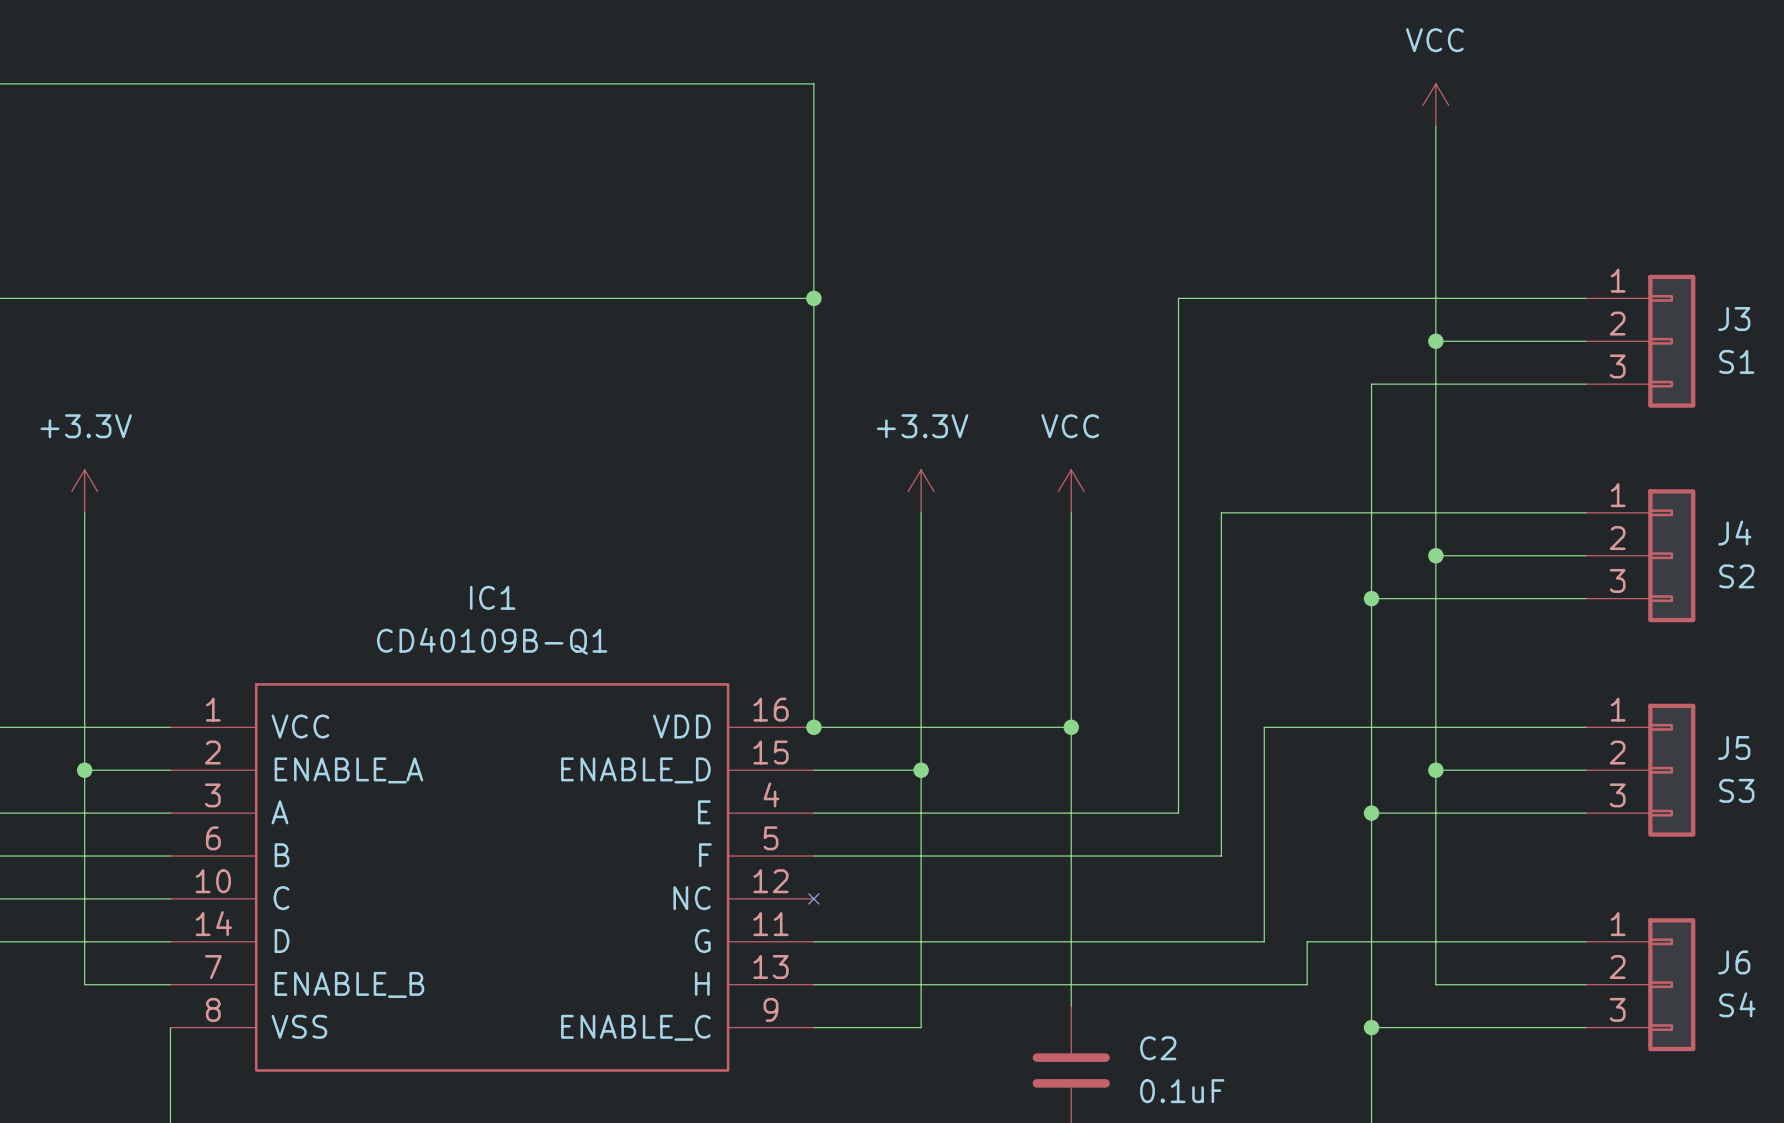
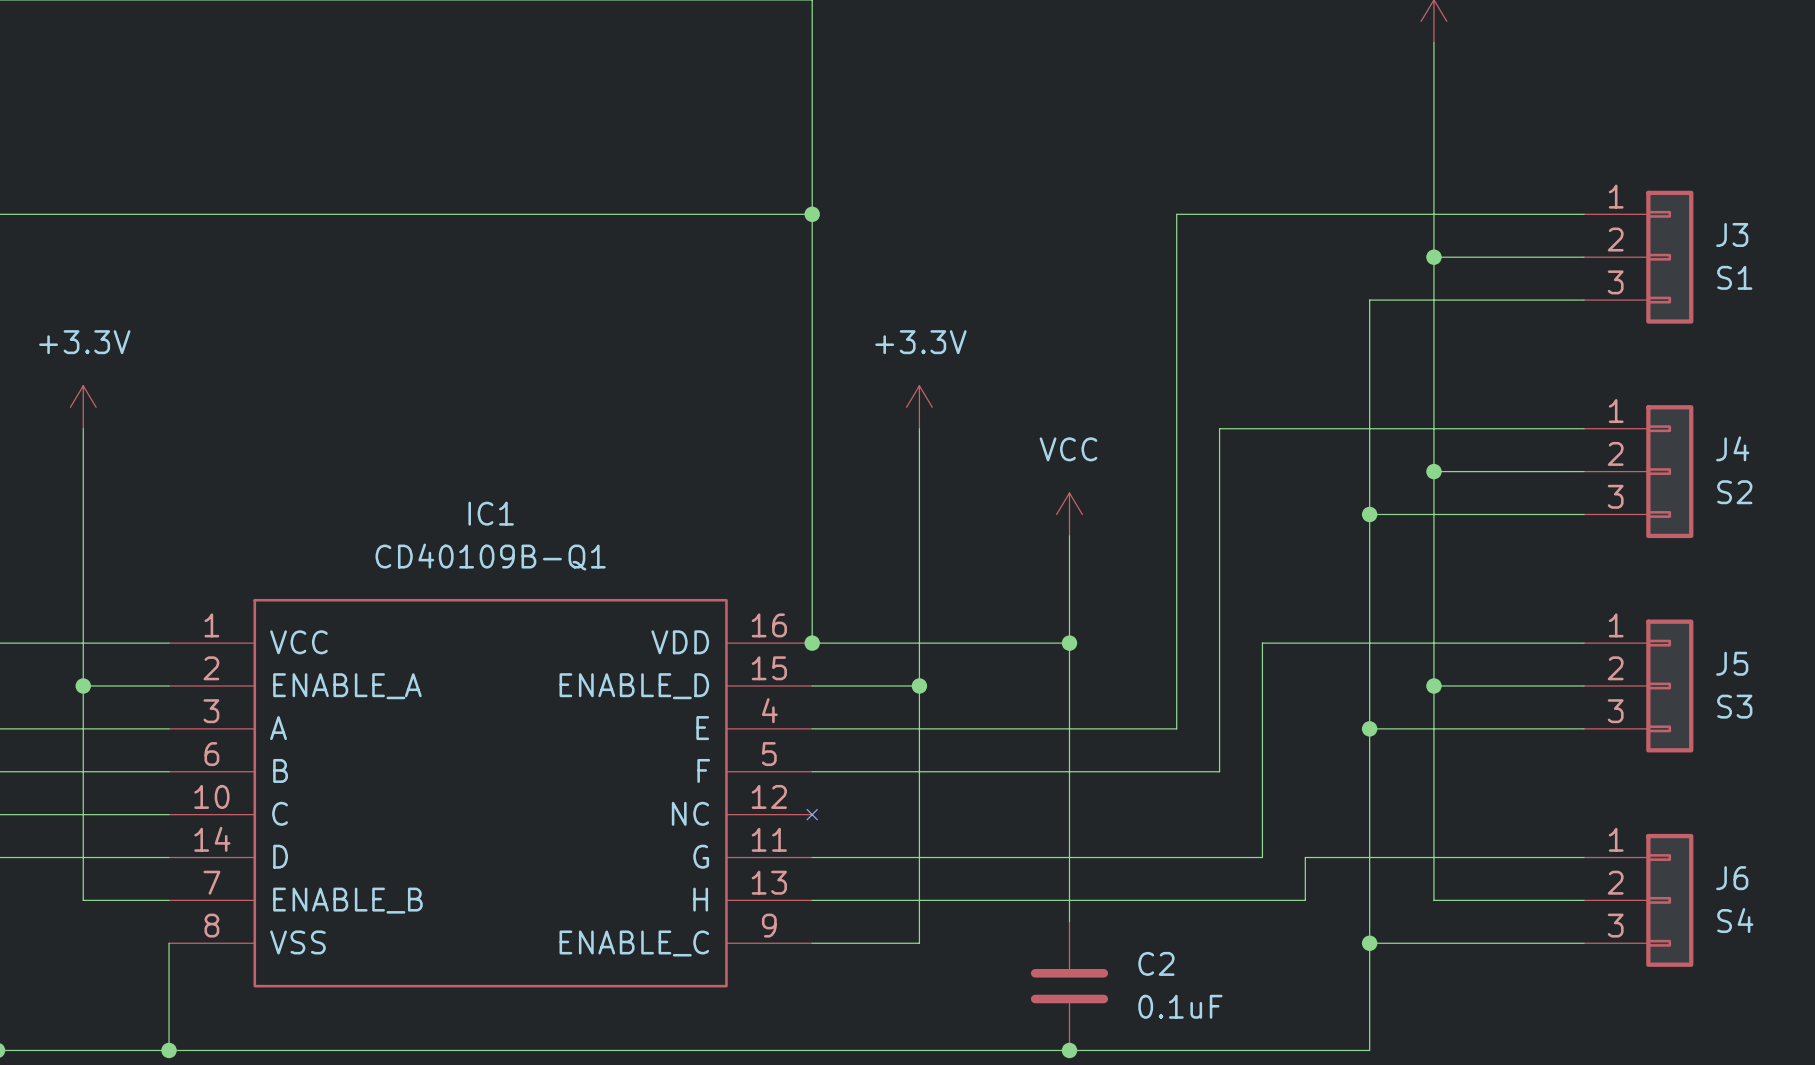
power symbol position: VCC (1071, 491) -> VCC (1069, 514)
wire: (1071, 512) (1071, 620) -> none

